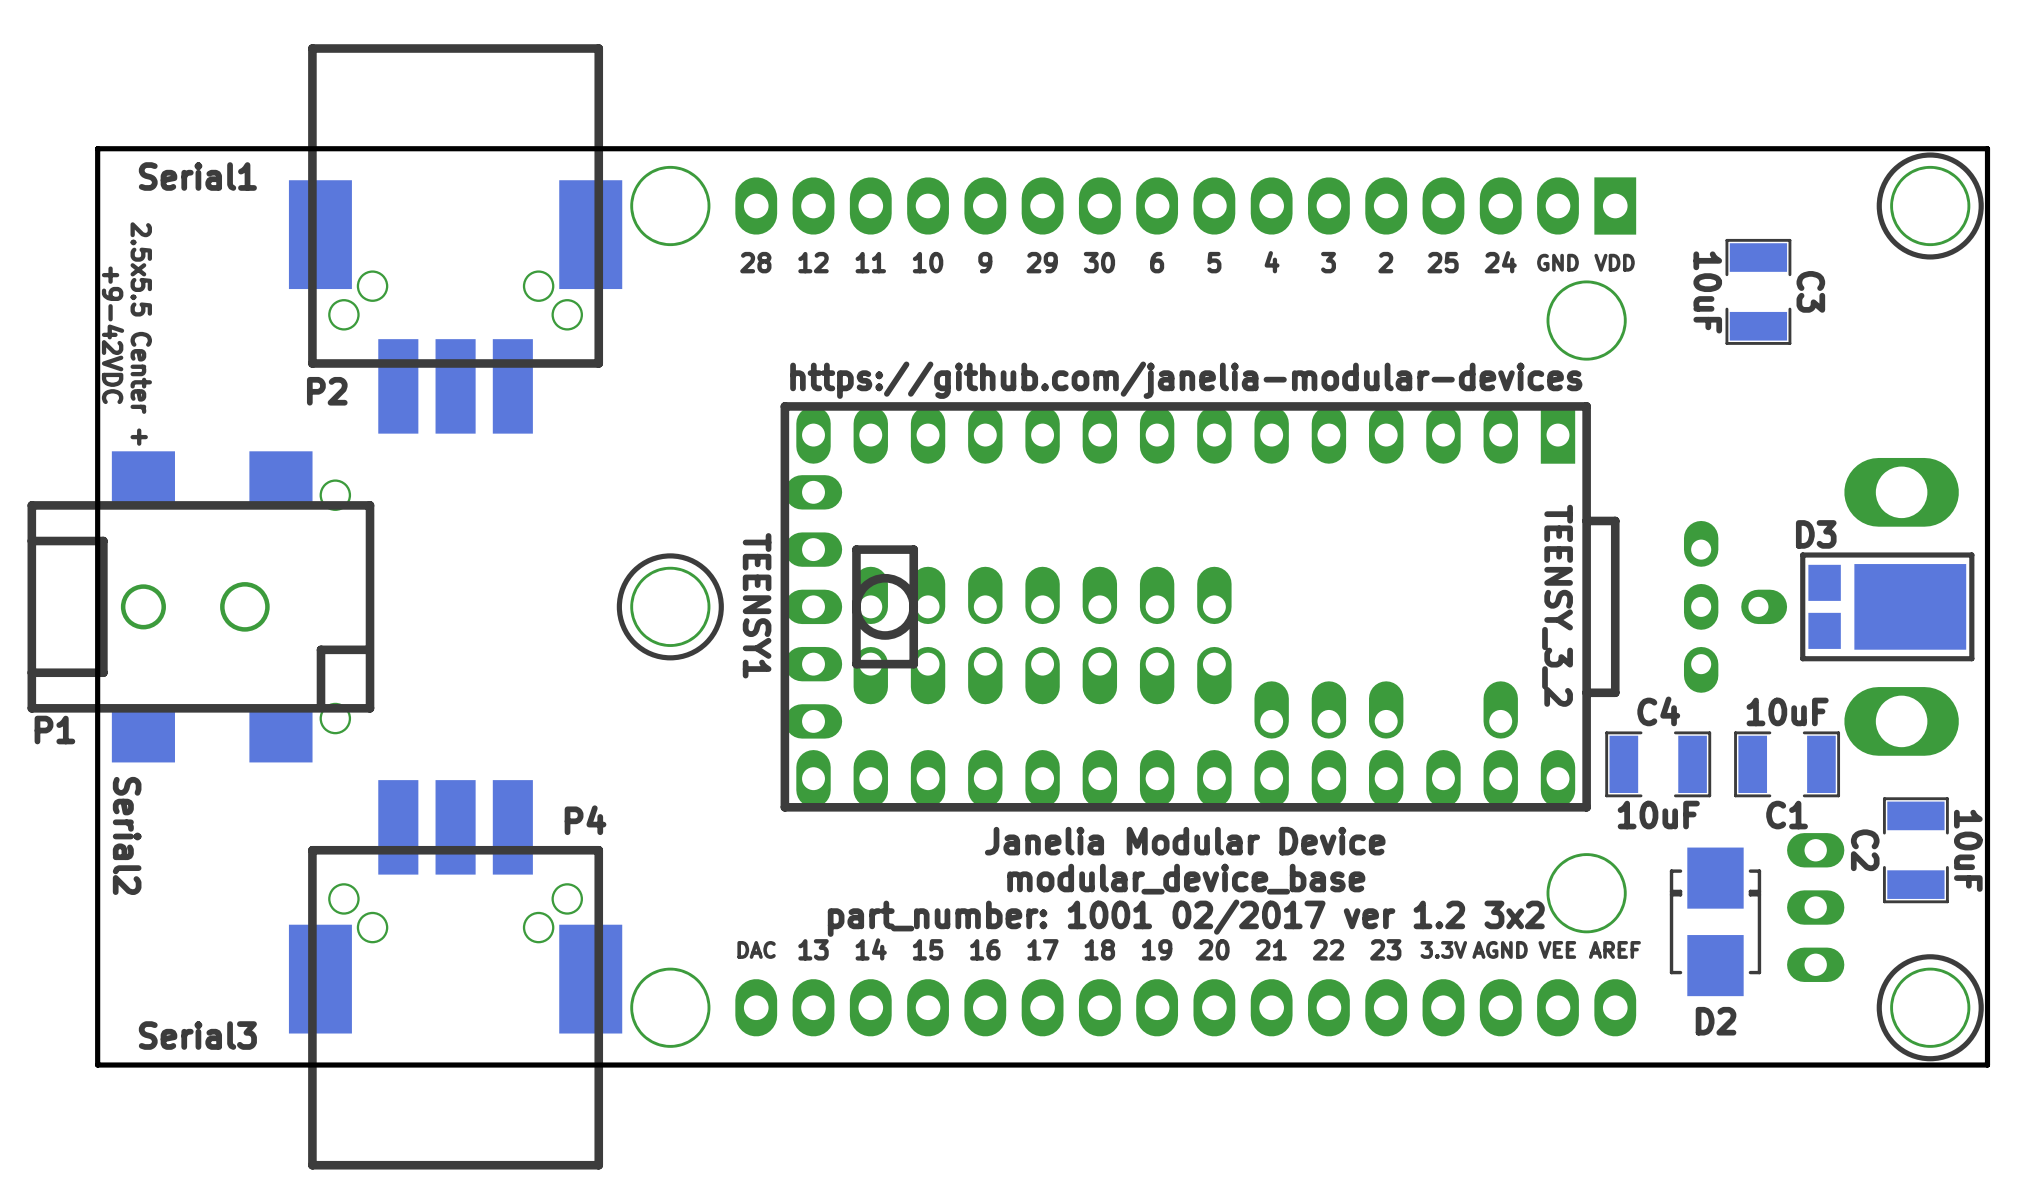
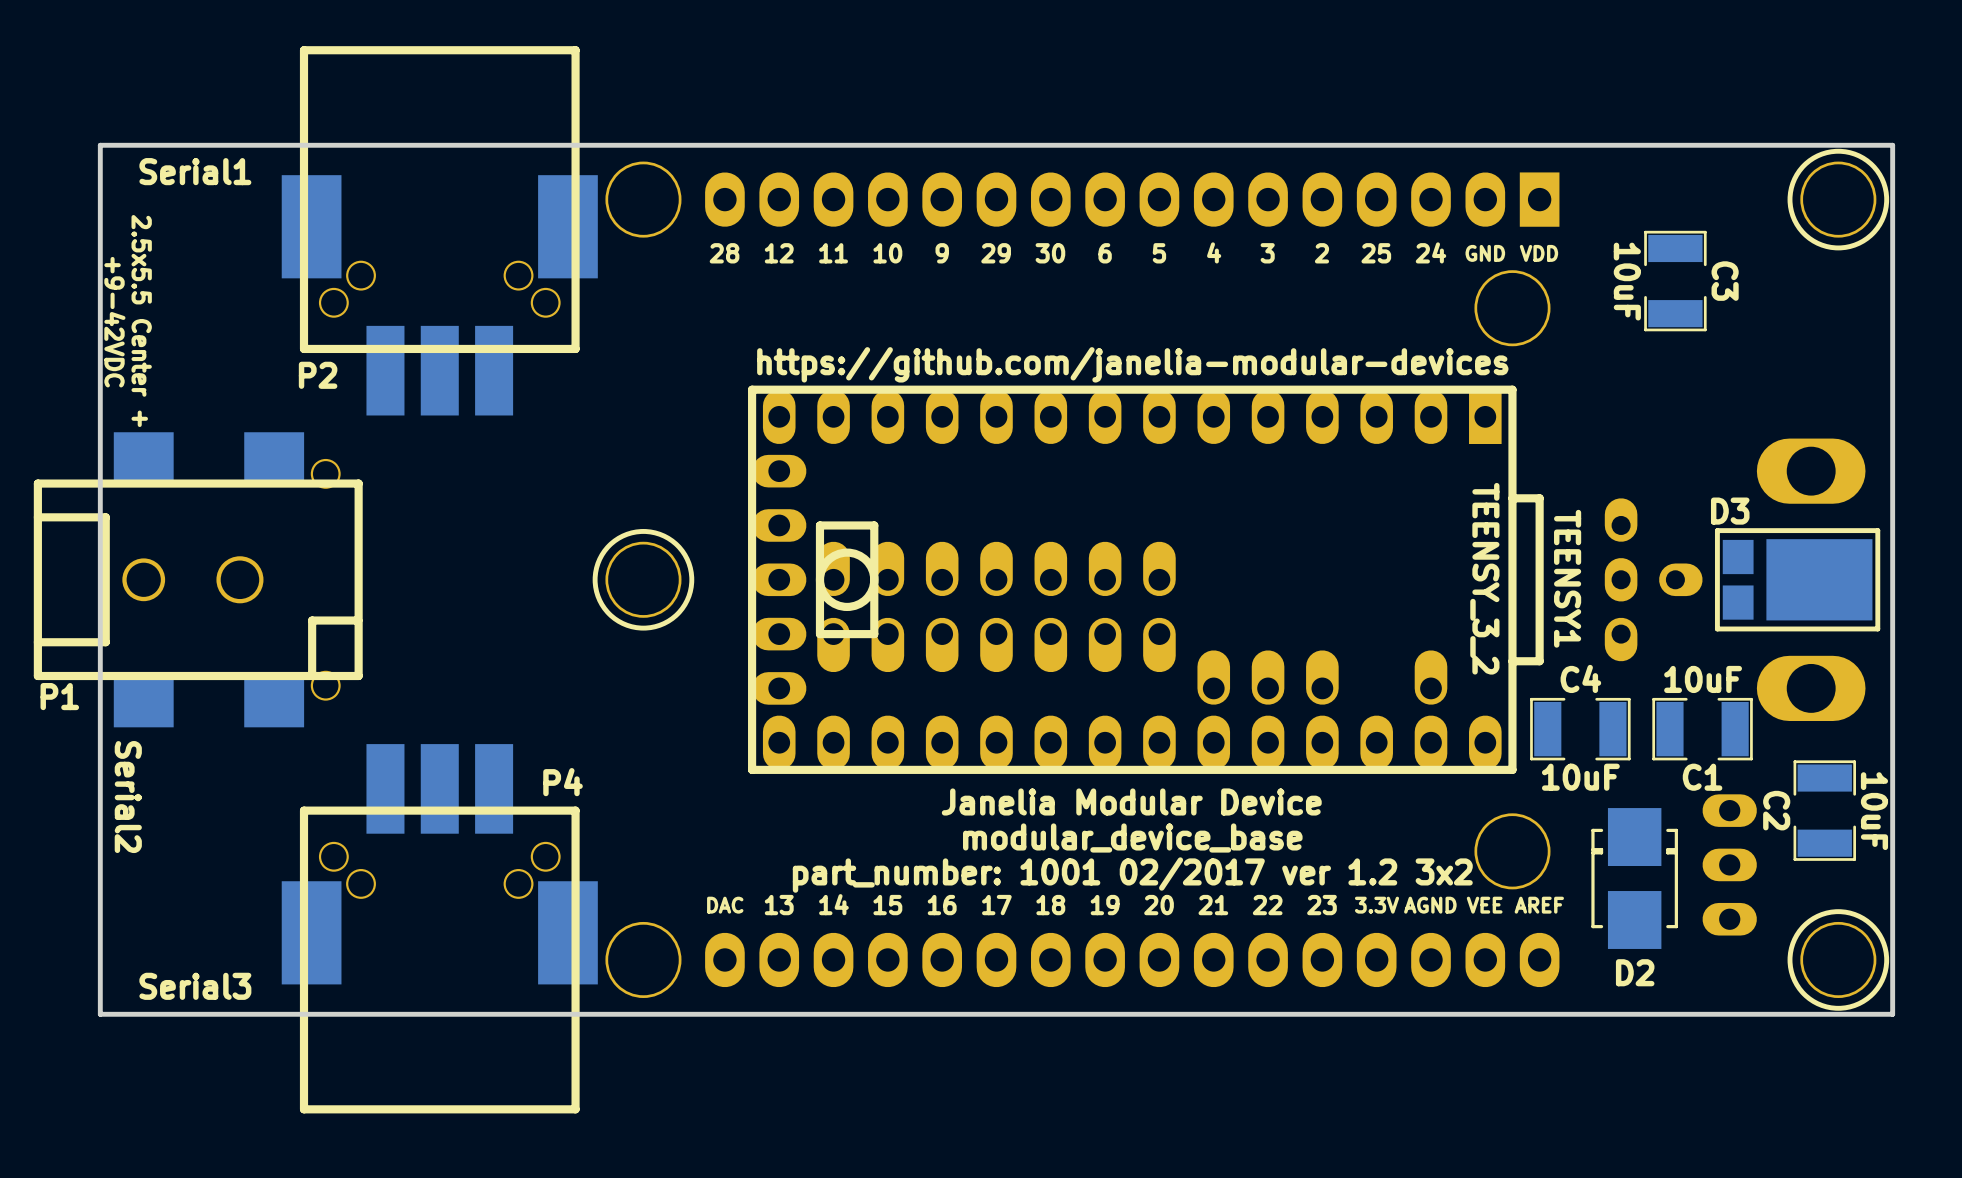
TEENSY1 name position: TEENSY1 (757, 605) -> TEENSY1 (1567, 578)

